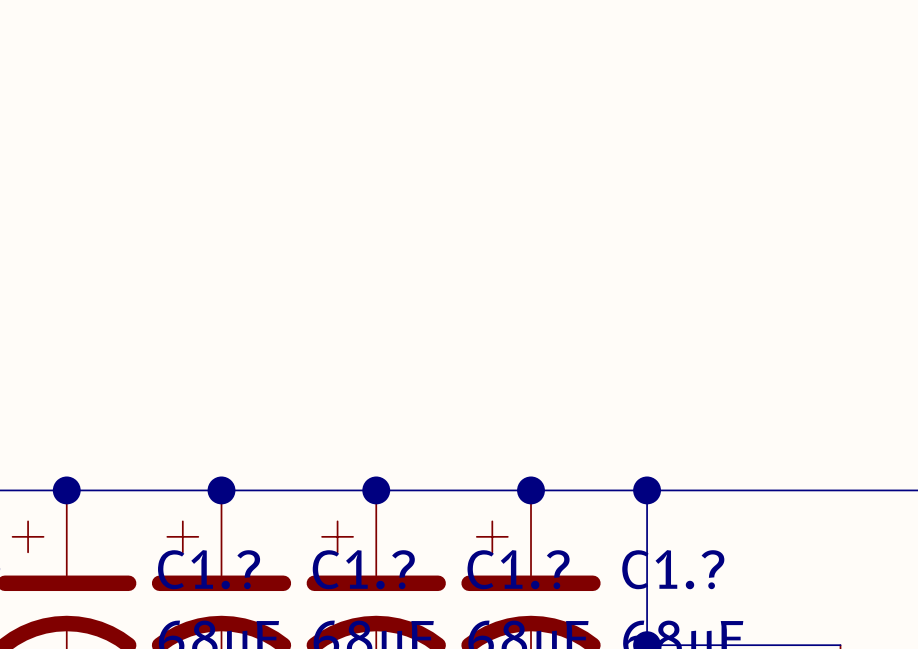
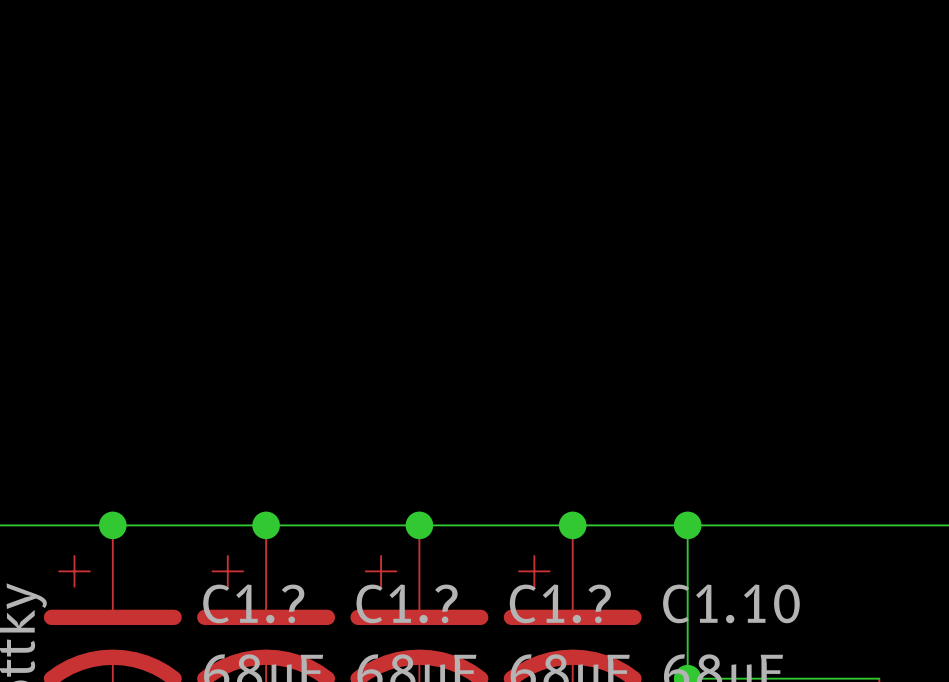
C1.? name: C1.? (673, 569) -> C1.10 (731, 603)

